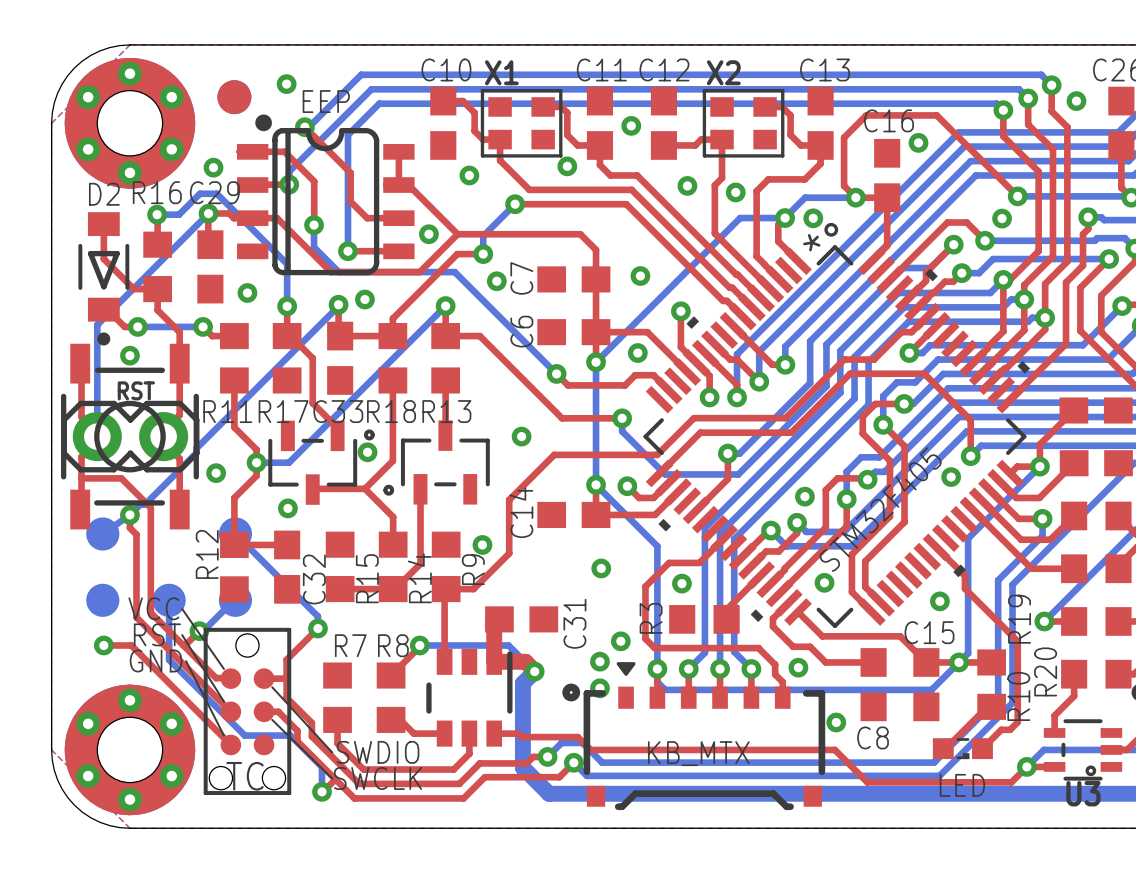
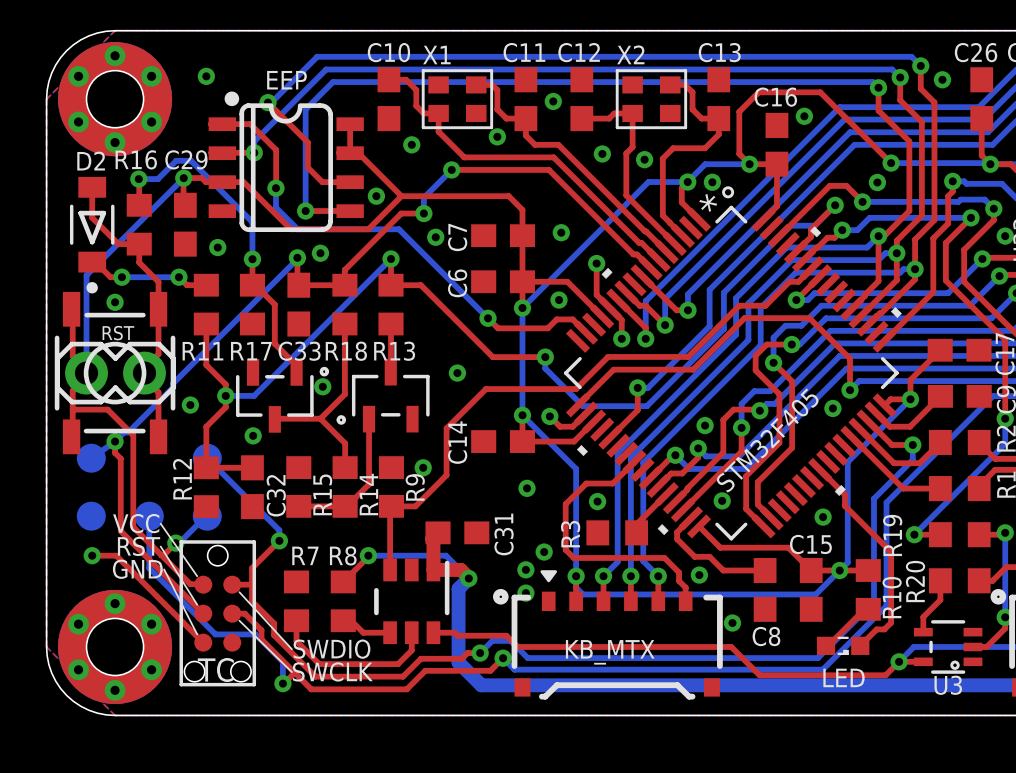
drawing: [217, 80, 252, 115] -> none
via: (286, 84) -> none
via: none -> (206, 76)
via: (213, 167) -> none

